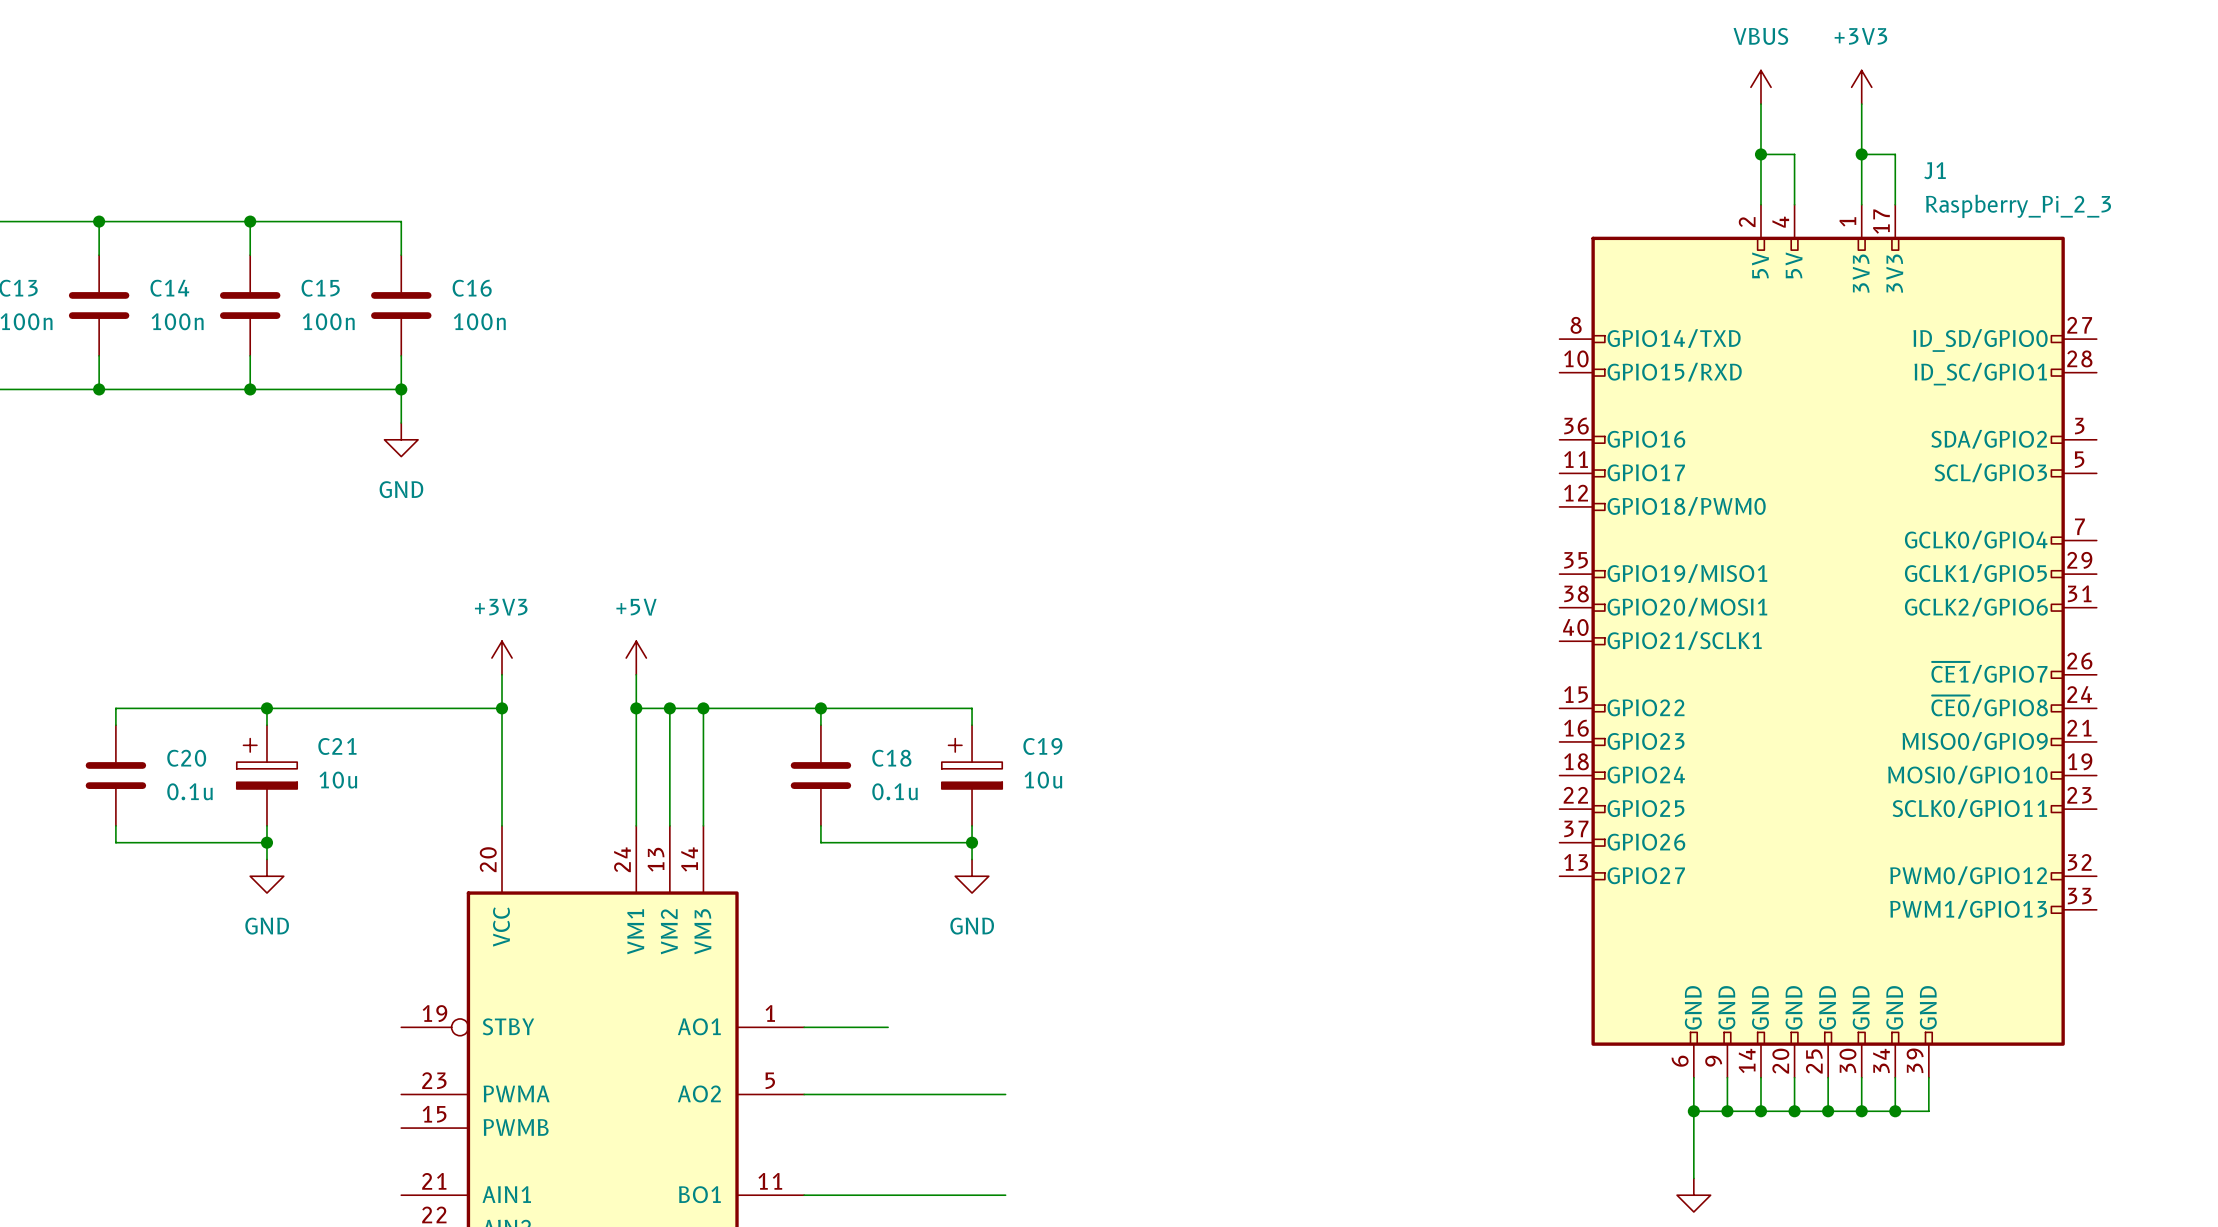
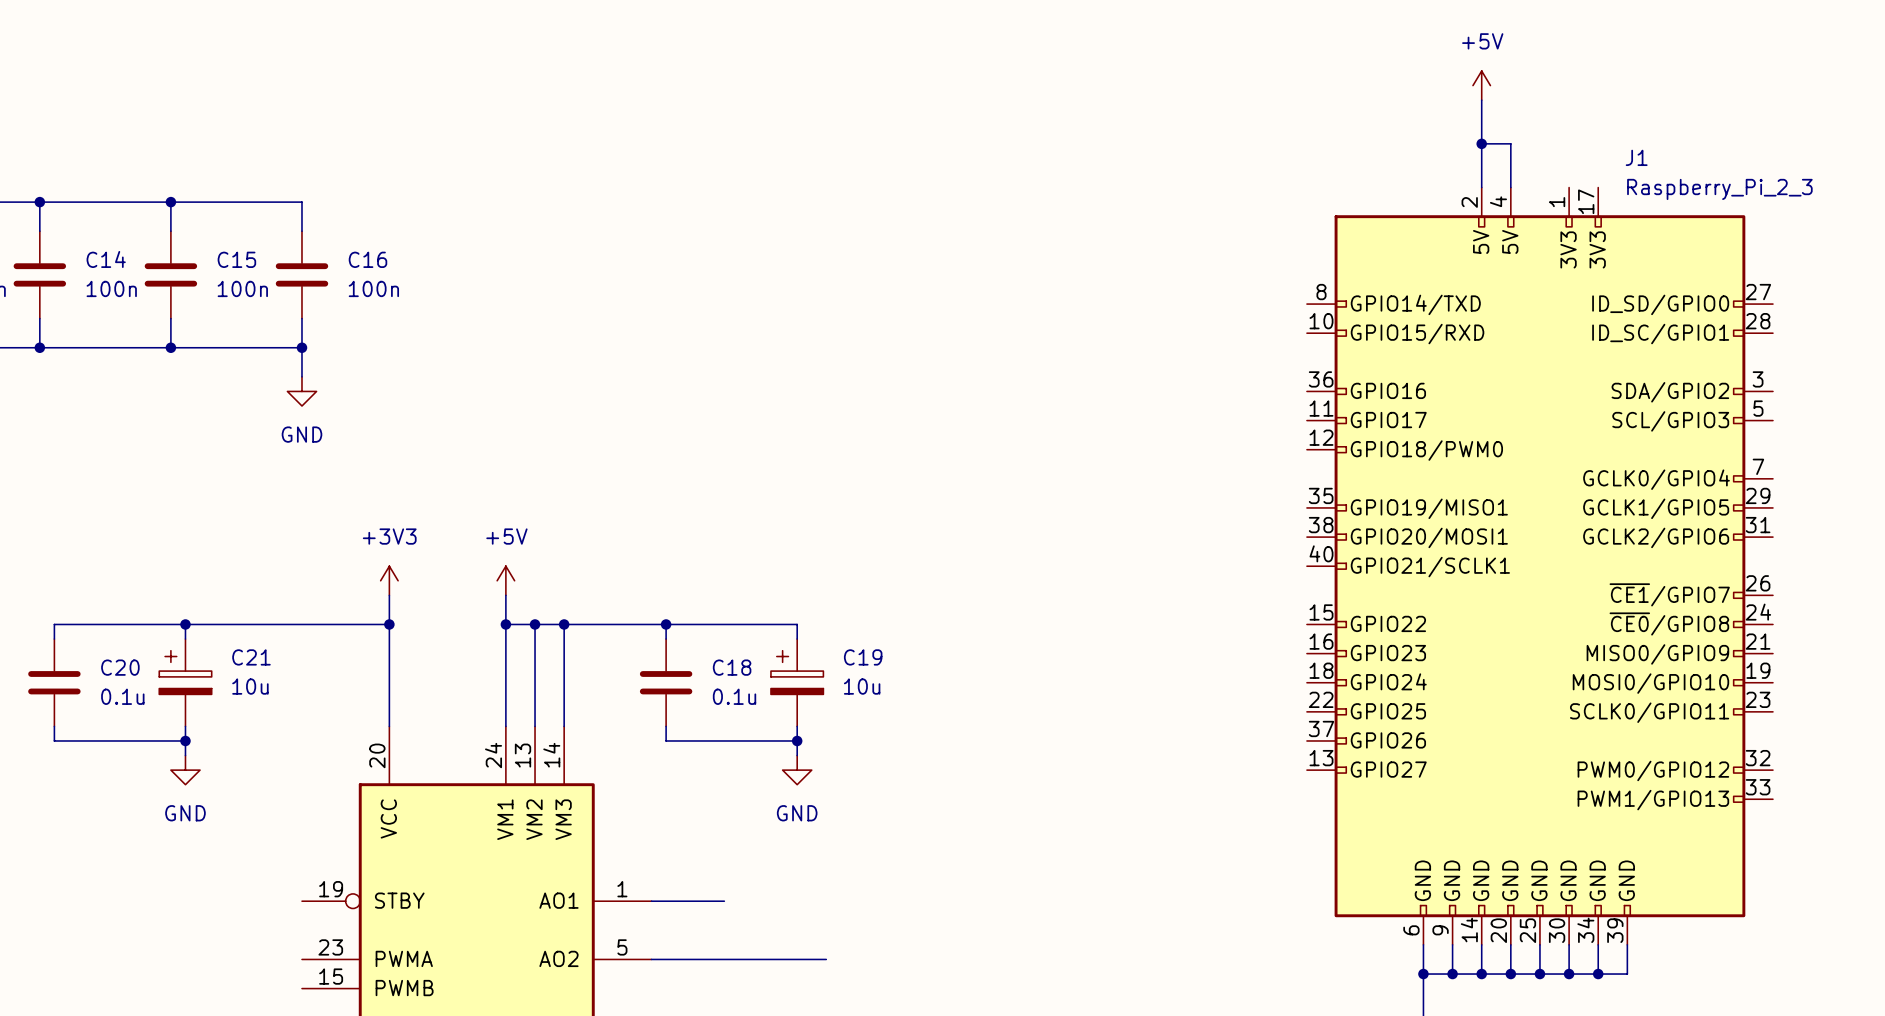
power symbol: VBUS (1760, 87) -> +5V (1481, 85)
power symbol: +3V3 (1861, 87) -> none
wire: (1861, 104) (1861, 204) -> none
wire: (1861, 154) (1895, 154) (1895, 204) -> none
junction: (1861, 154) -> none

